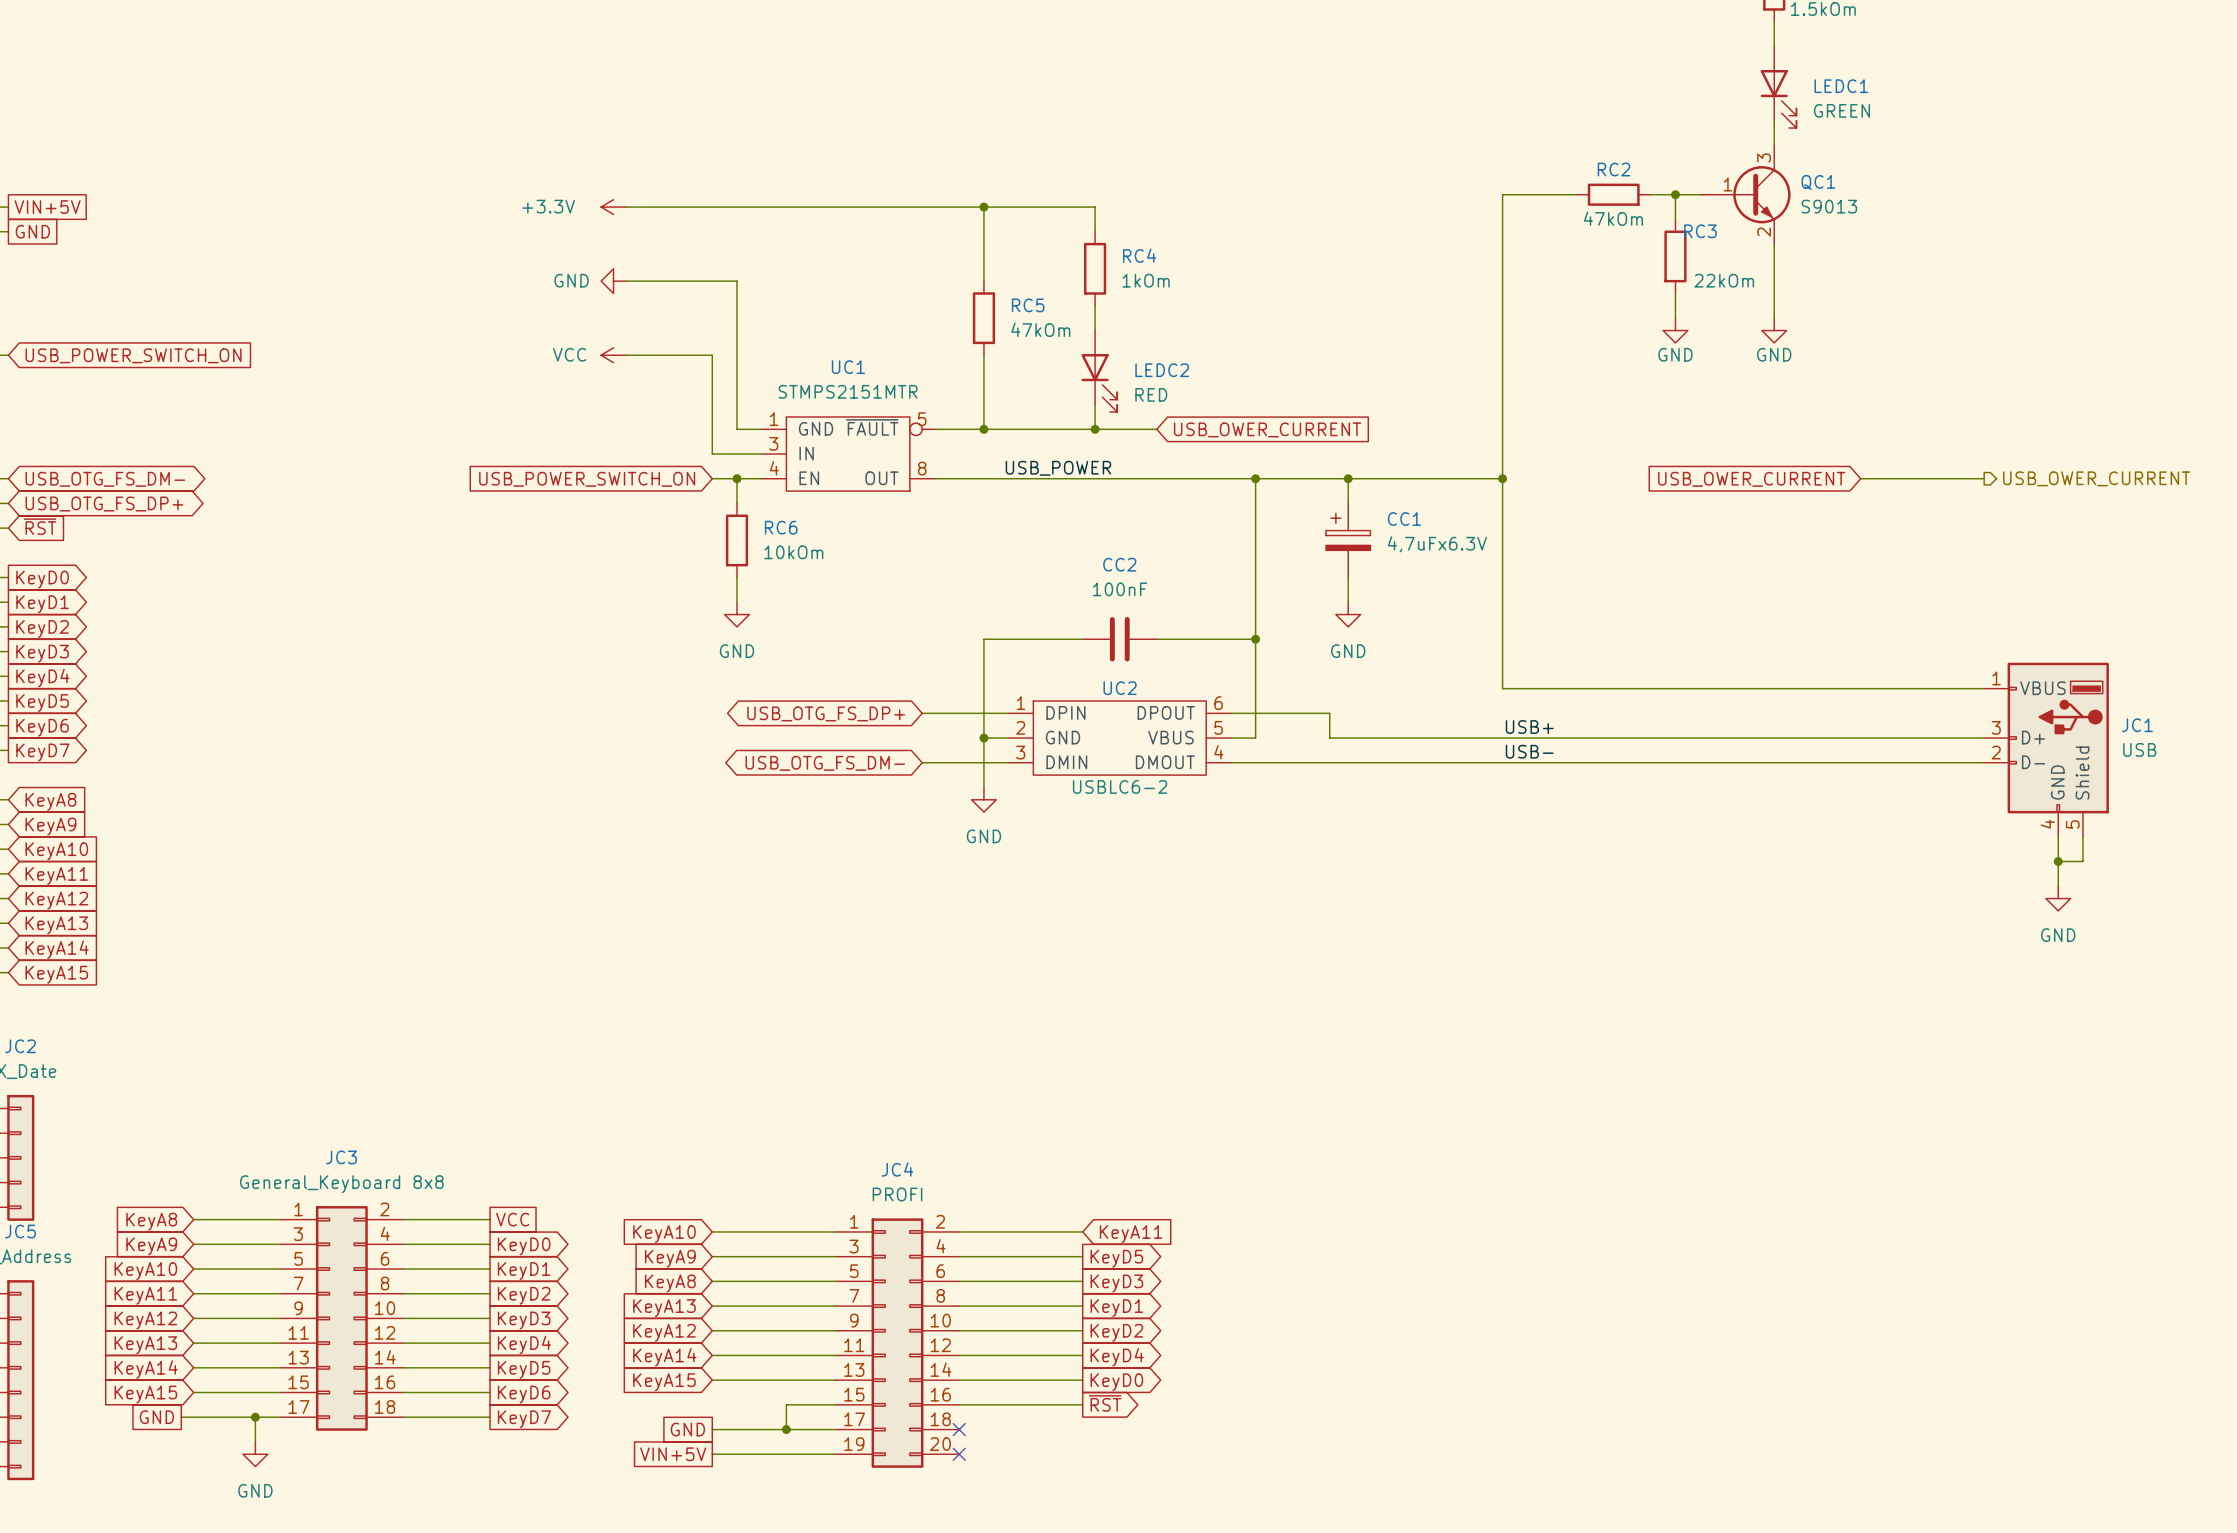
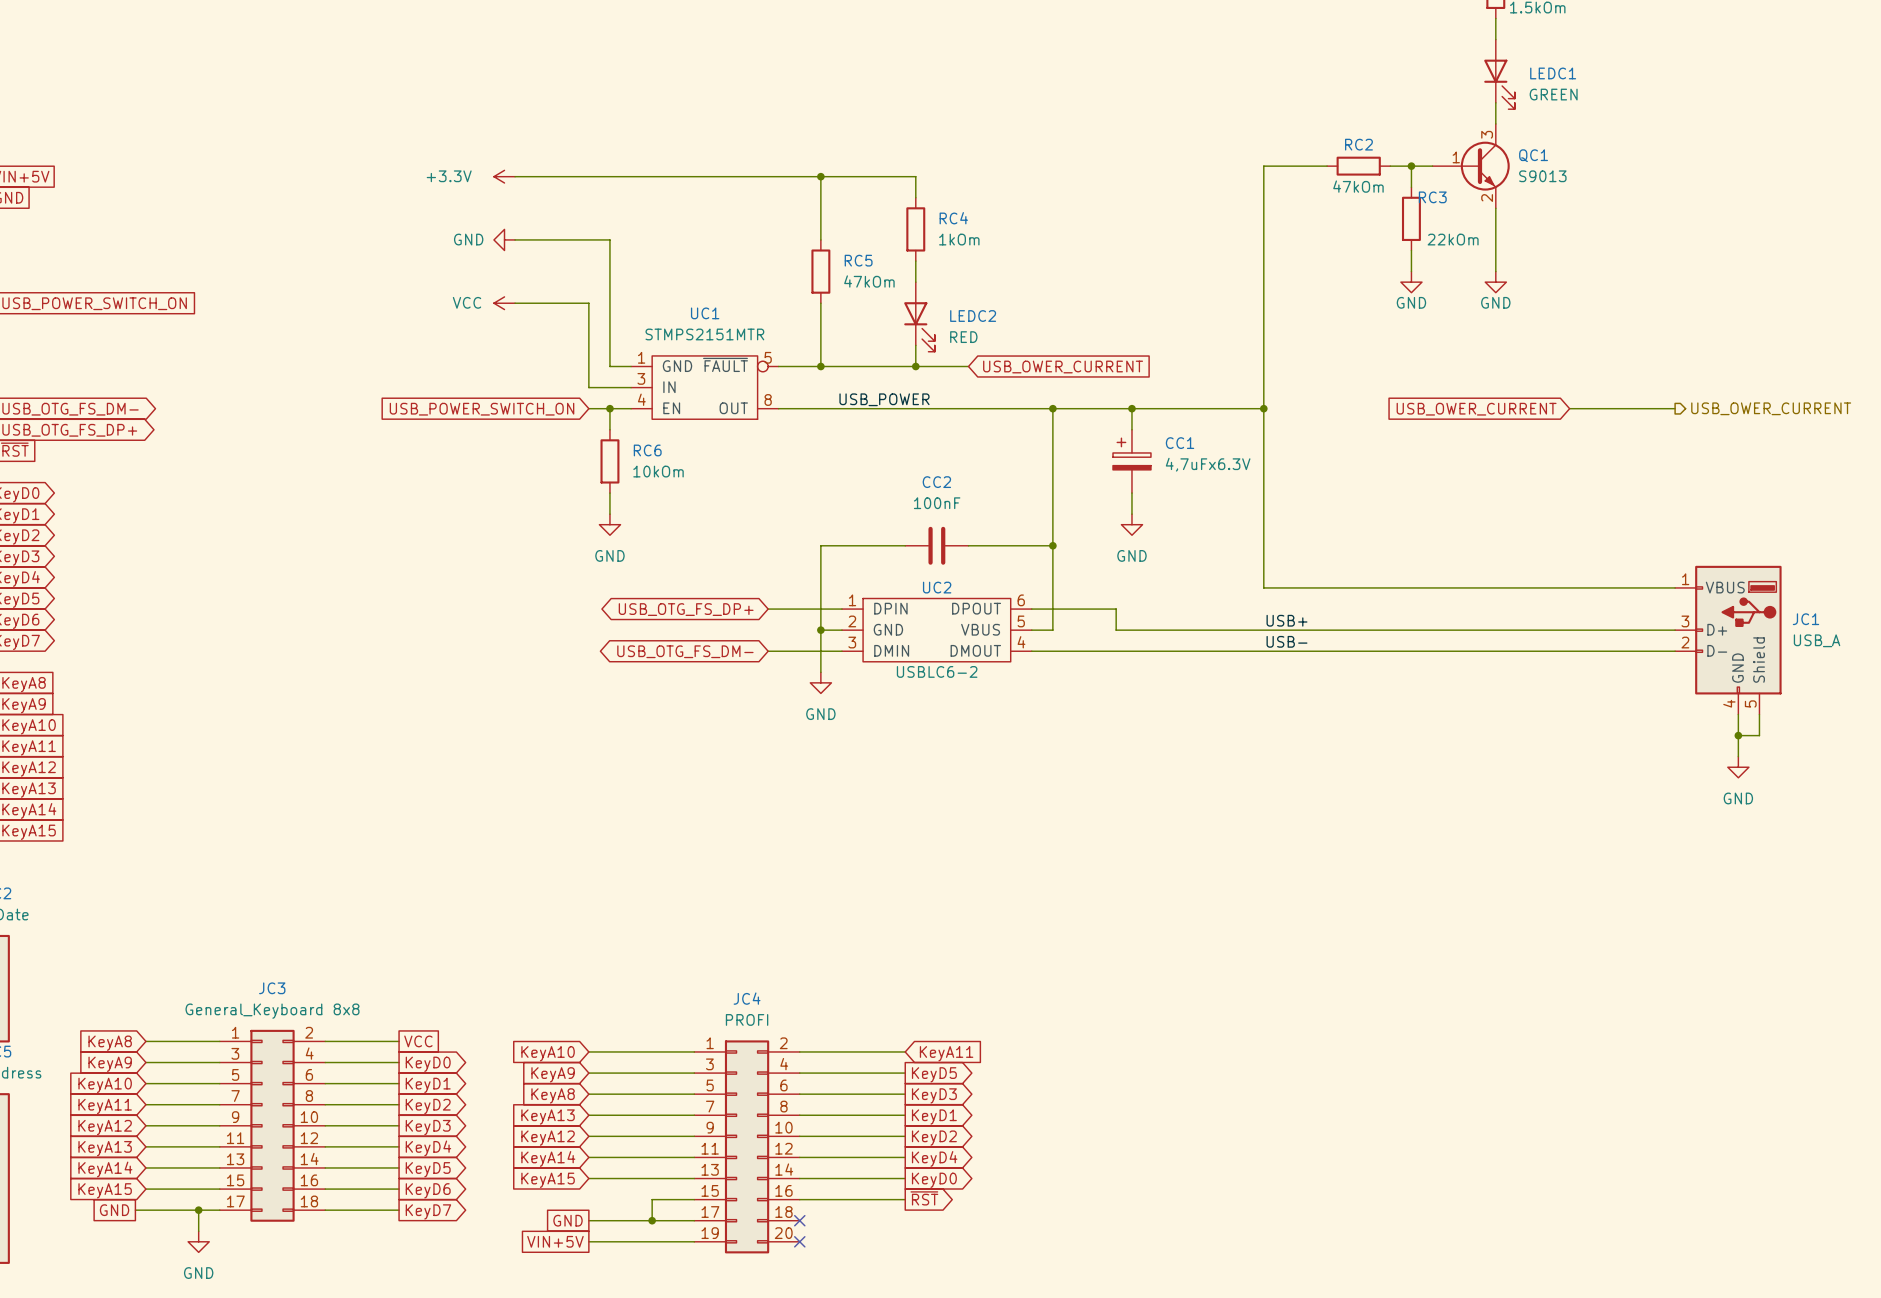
JC1 value: USB (2139, 749) -> USB_A (1817, 640)

